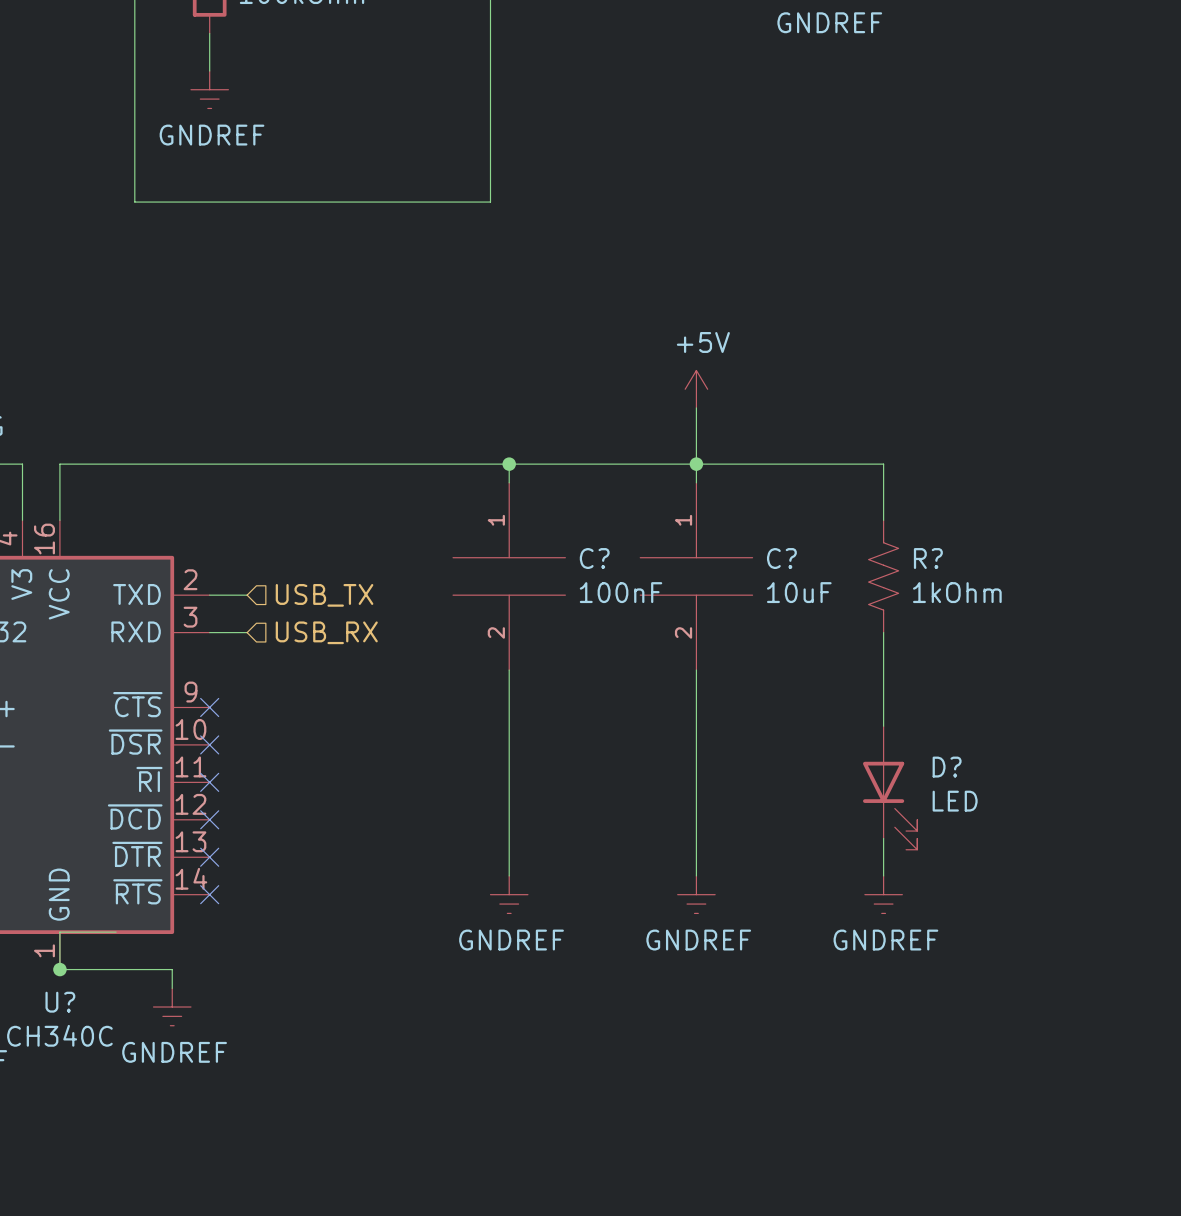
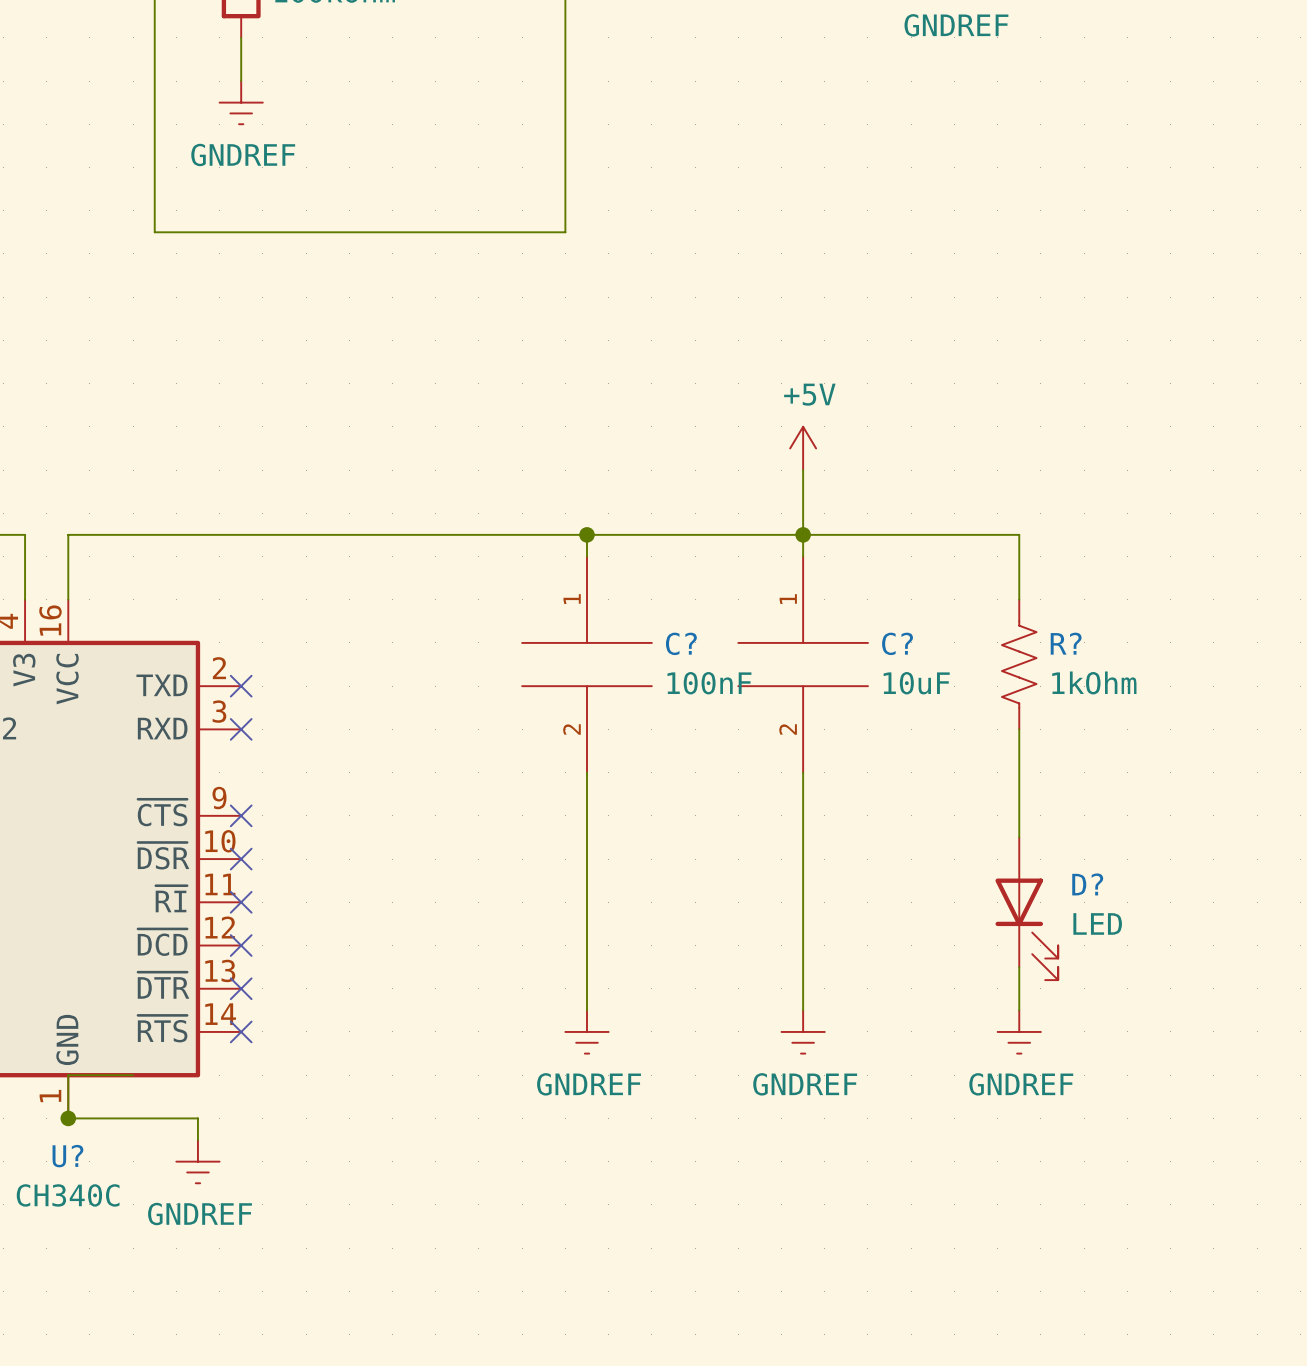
wire: (209, 595) (247, 595) -> none
no-connect mark: none -> (241, 686)
hierarchical label: USB_TX (324, 595) -> none
wire: (209, 632) (247, 632) -> none
no-connect mark: none -> (241, 729)
hierarchical label: USB_RX (326, 632) -> none

